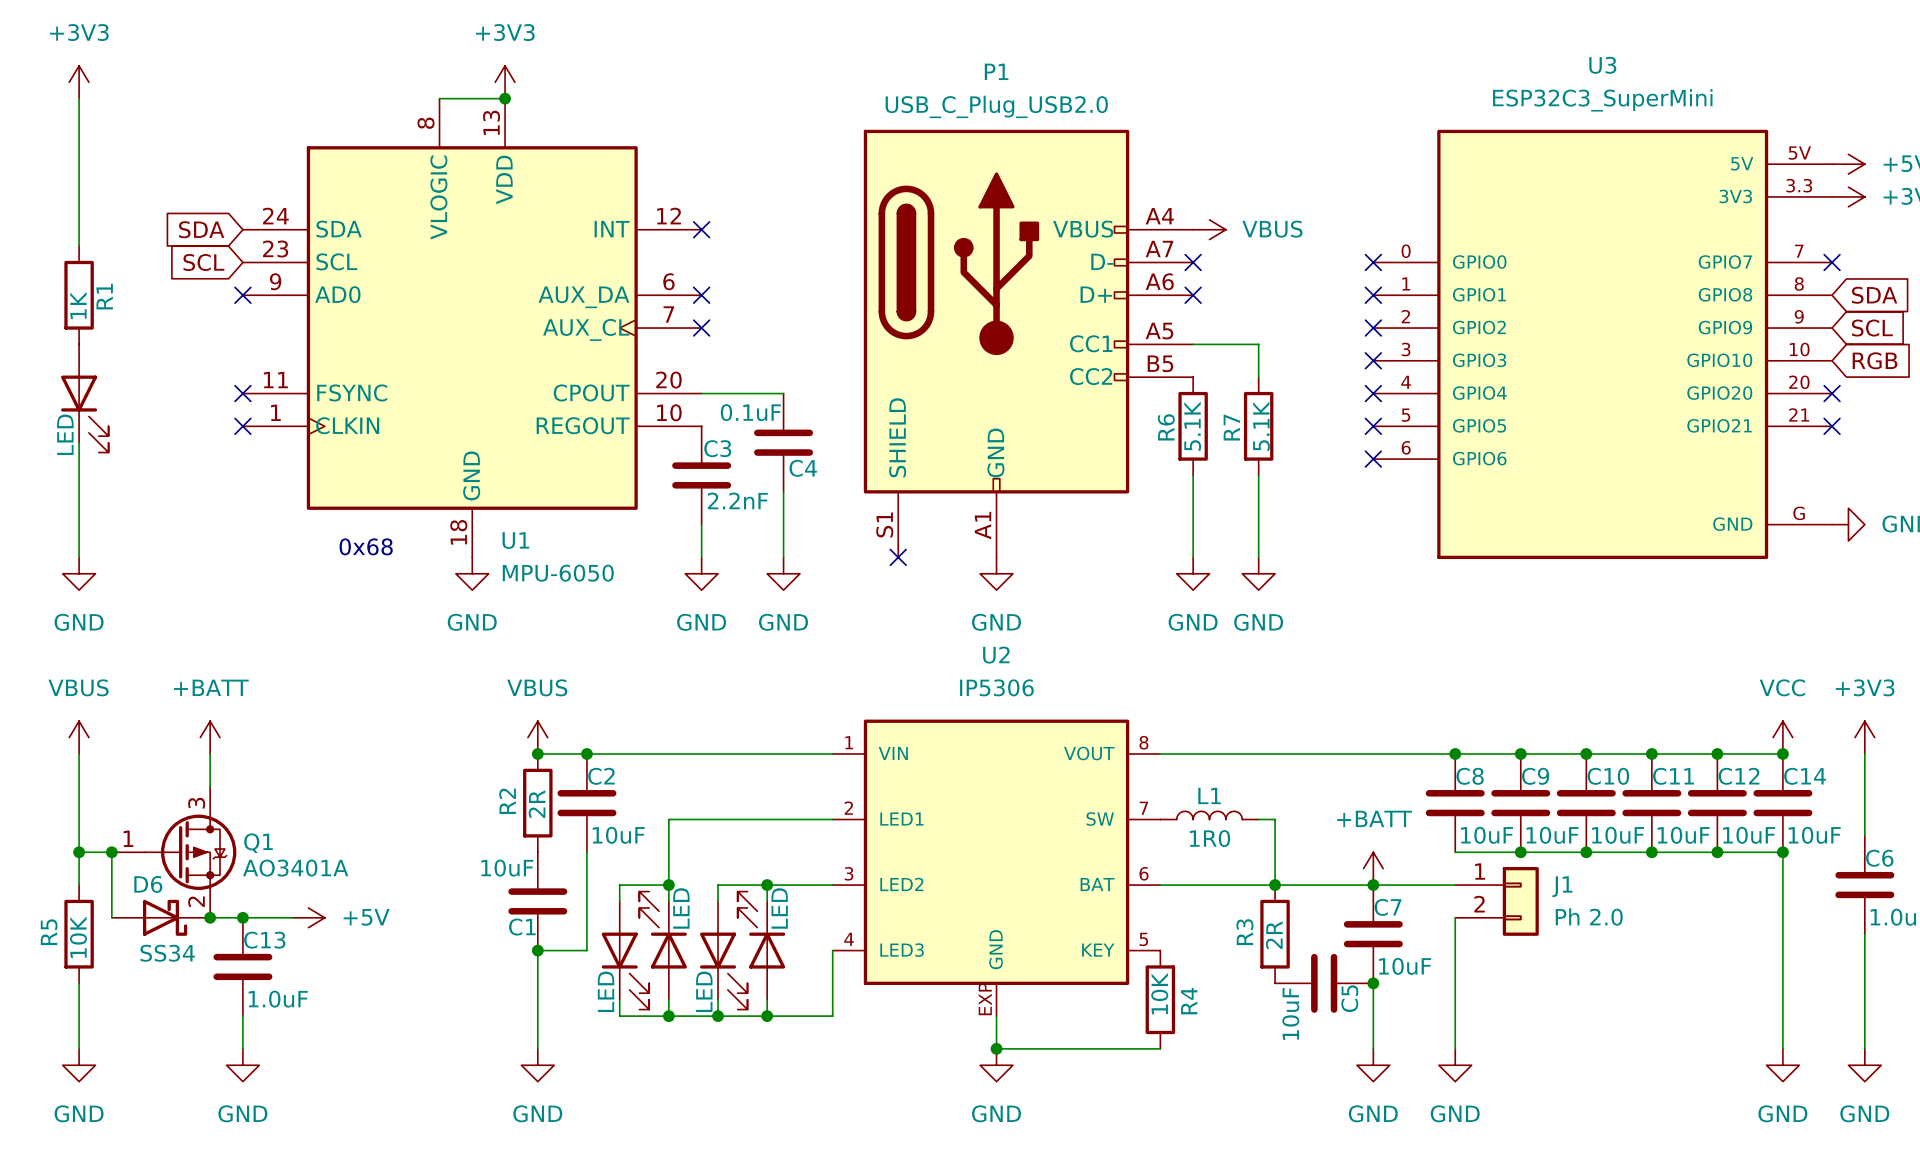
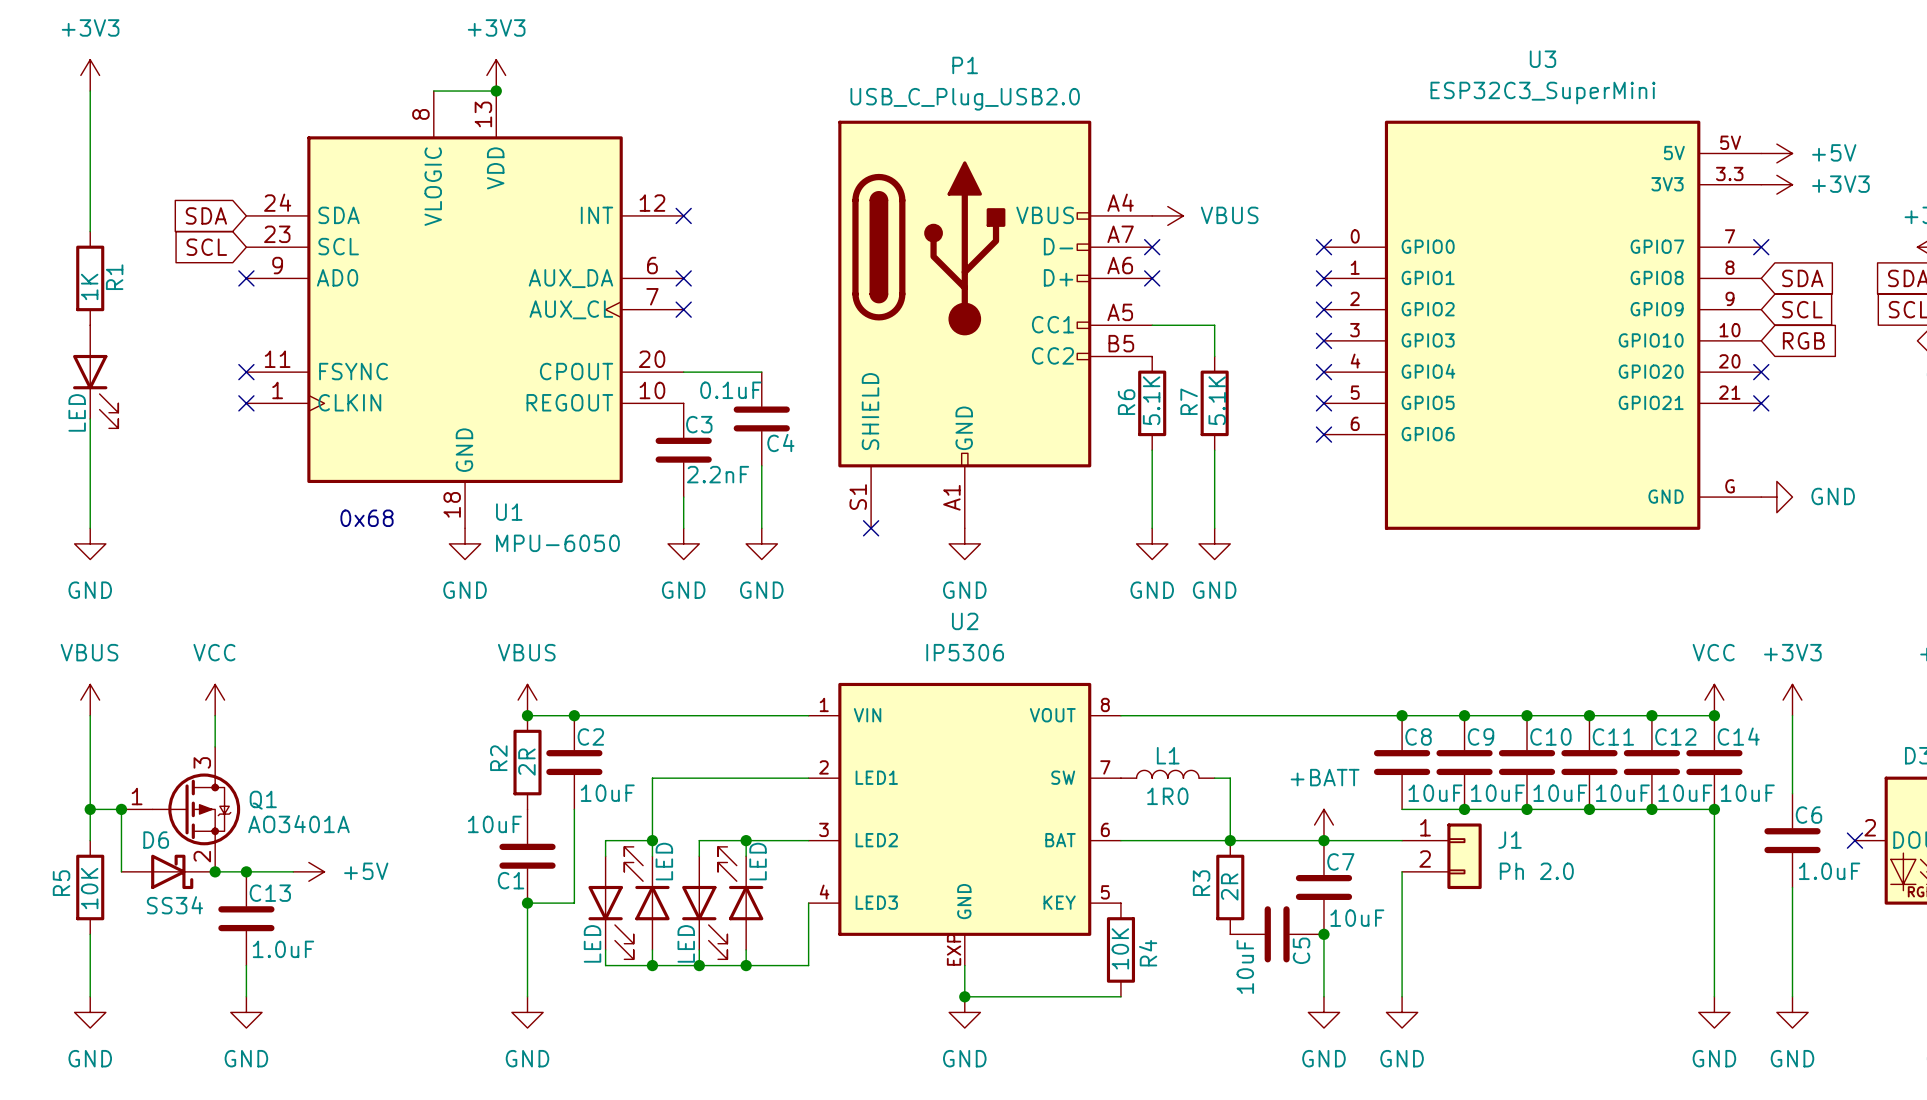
power symbol: +BATT (210, 737) -> VCC (215, 700)

